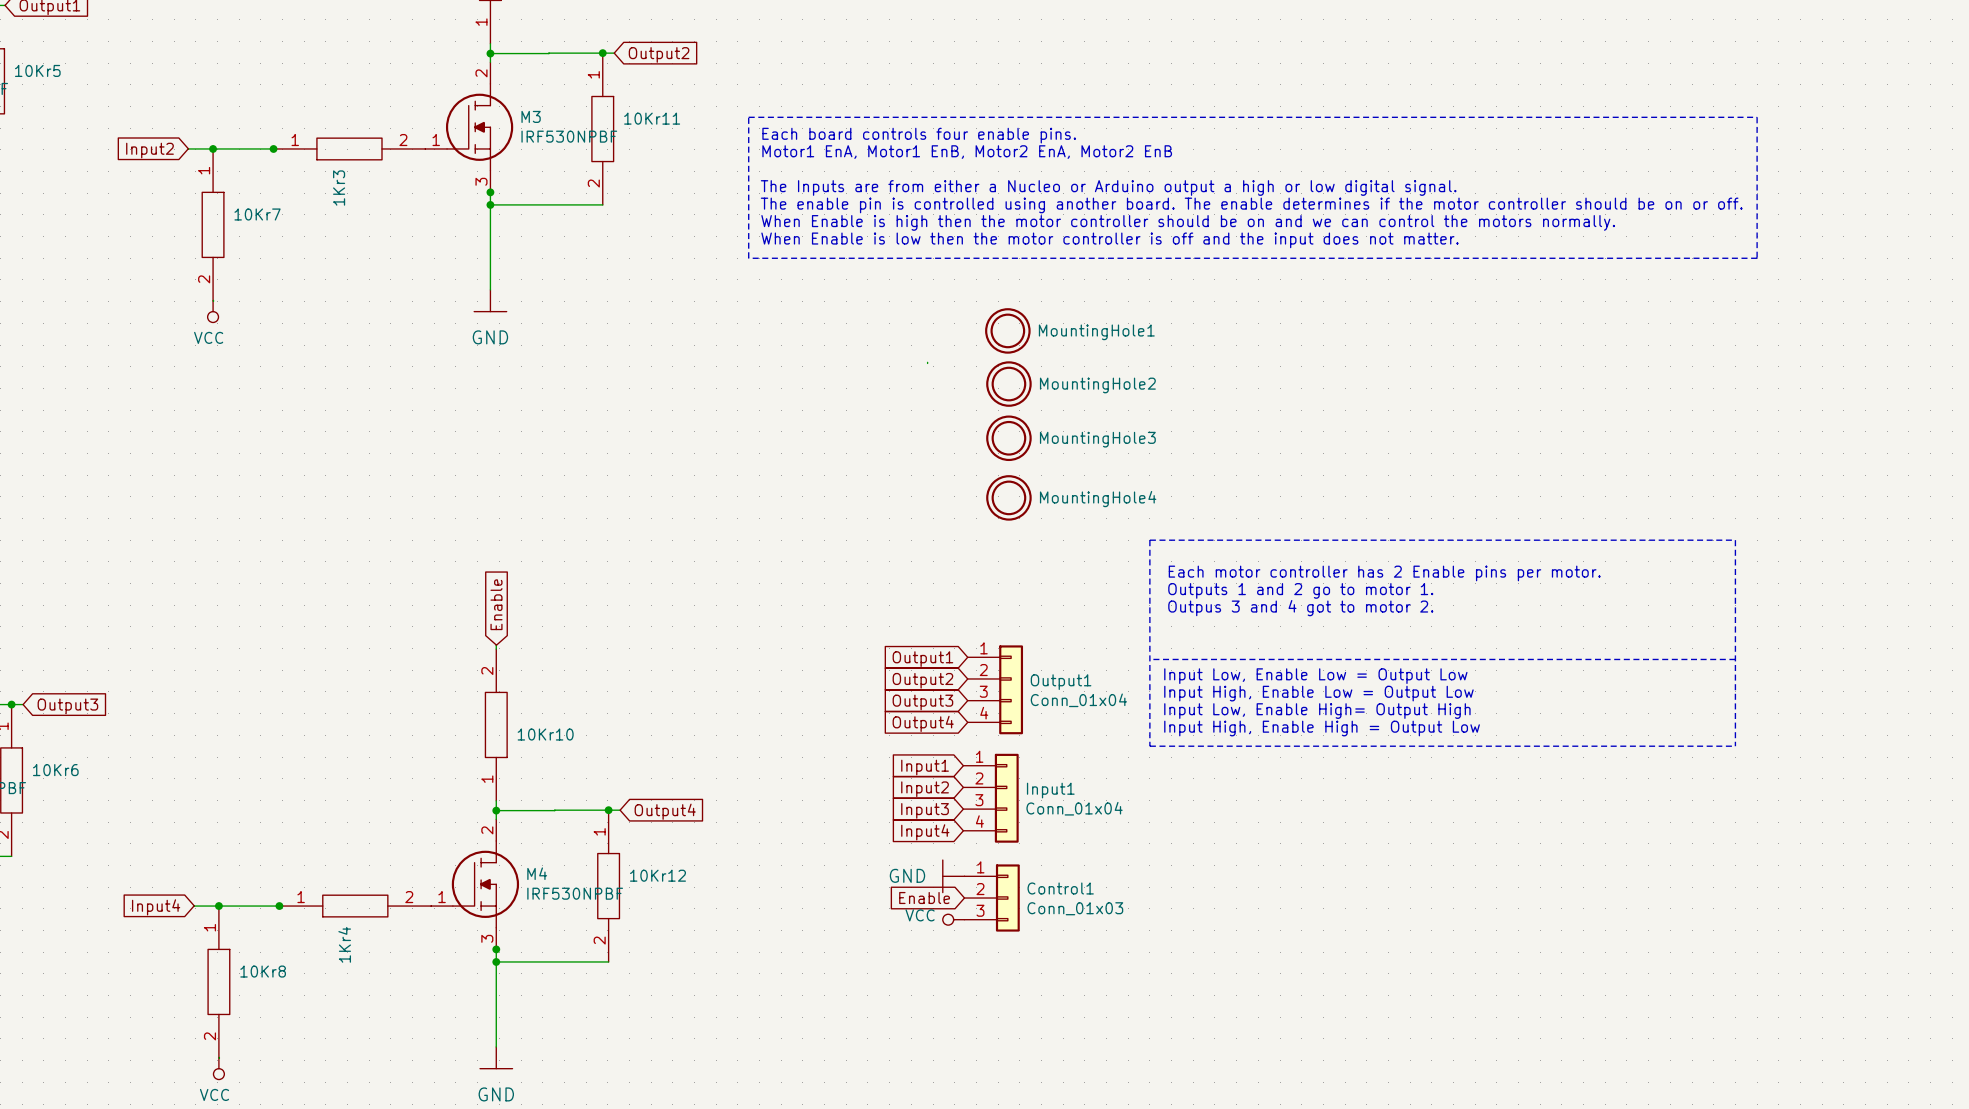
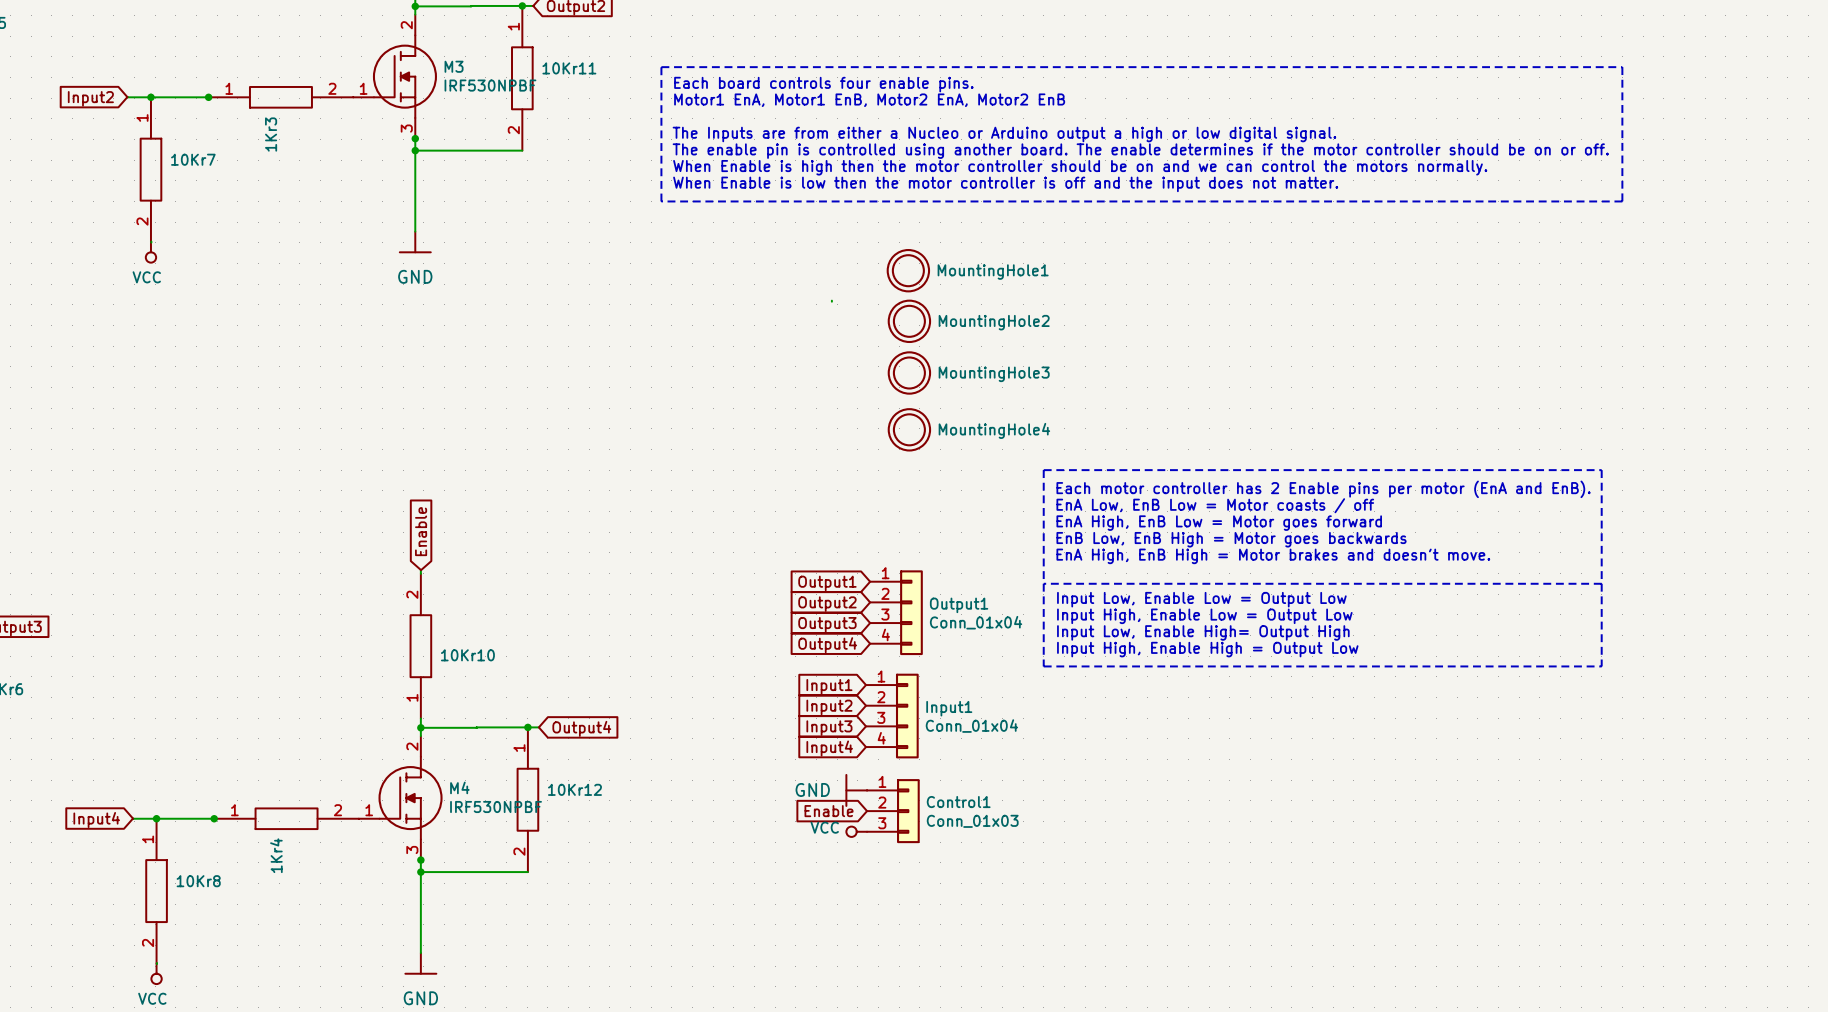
text: Each motor controller has 2 Enable pins per motor. (1384, 573) -> Each motor controller has 2 Enable pins per motor (EnA and EnB). (1323, 489)
text: none -> EnA Low, EnB Low = Motor coasts / off (1215, 505)
text: Outputs 1 and 2 go to motor 1. (1300, 590) -> none
text: none -> EnA High, EnB Low = Motor goes forward (1219, 523)
text: Outpus 3 and 4 got to motor 2. (1300, 608) -> none
text: none -> EnB Low, EnB High = Motor goes backwards (1231, 539)
text: none -> EnA High, EnB High = Motor brakes and doesn't move. (1273, 556)

